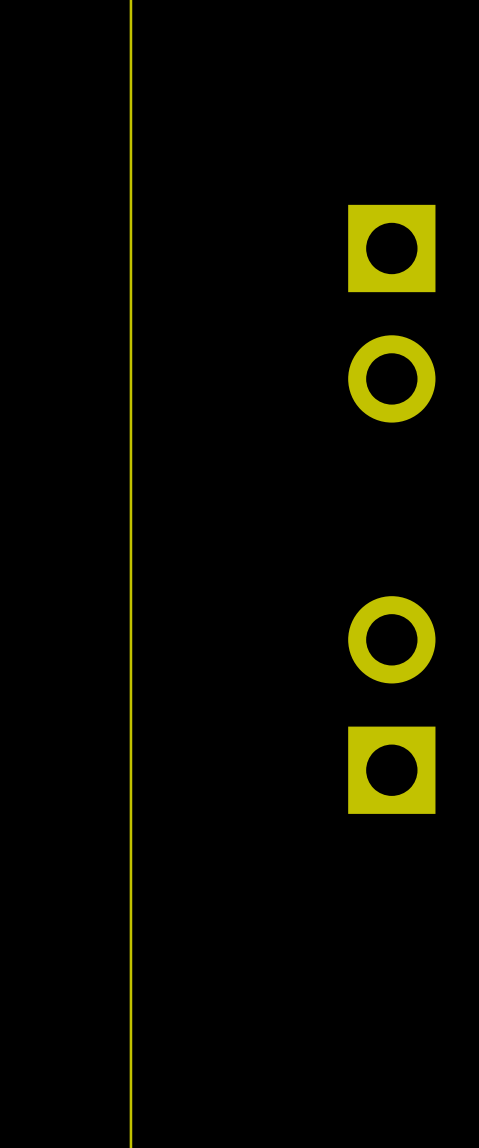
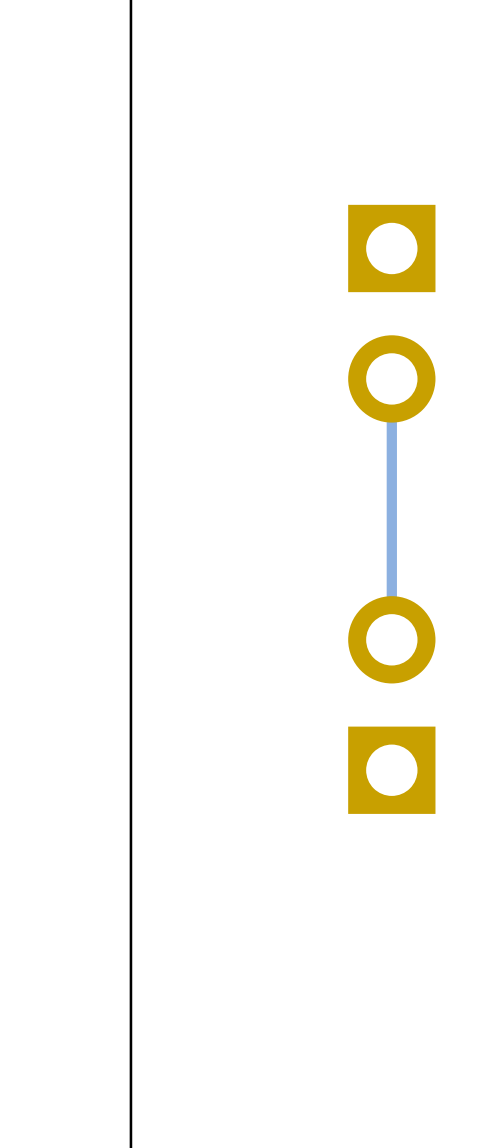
track: none -> (391, 378) (391, 639)

